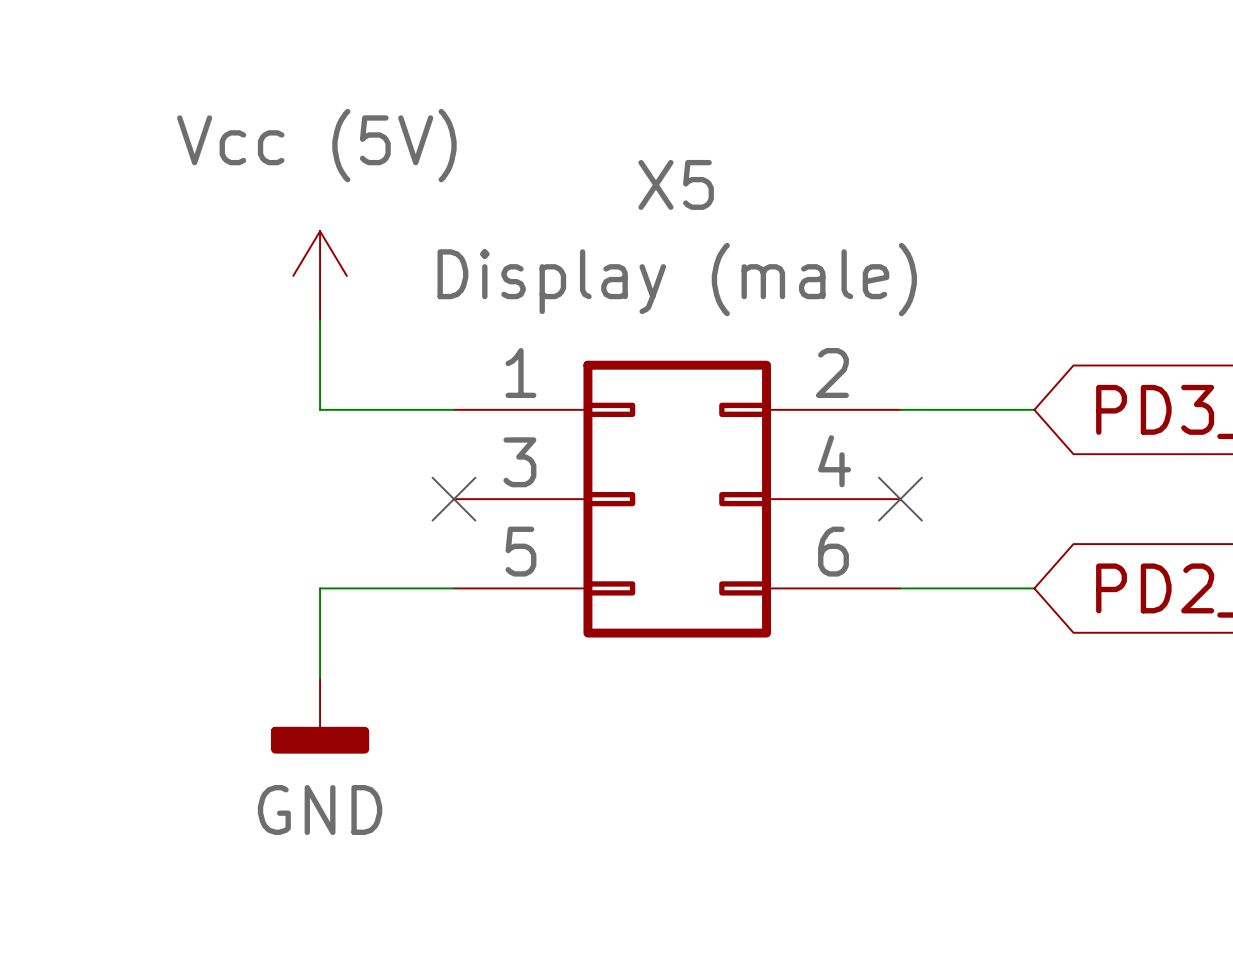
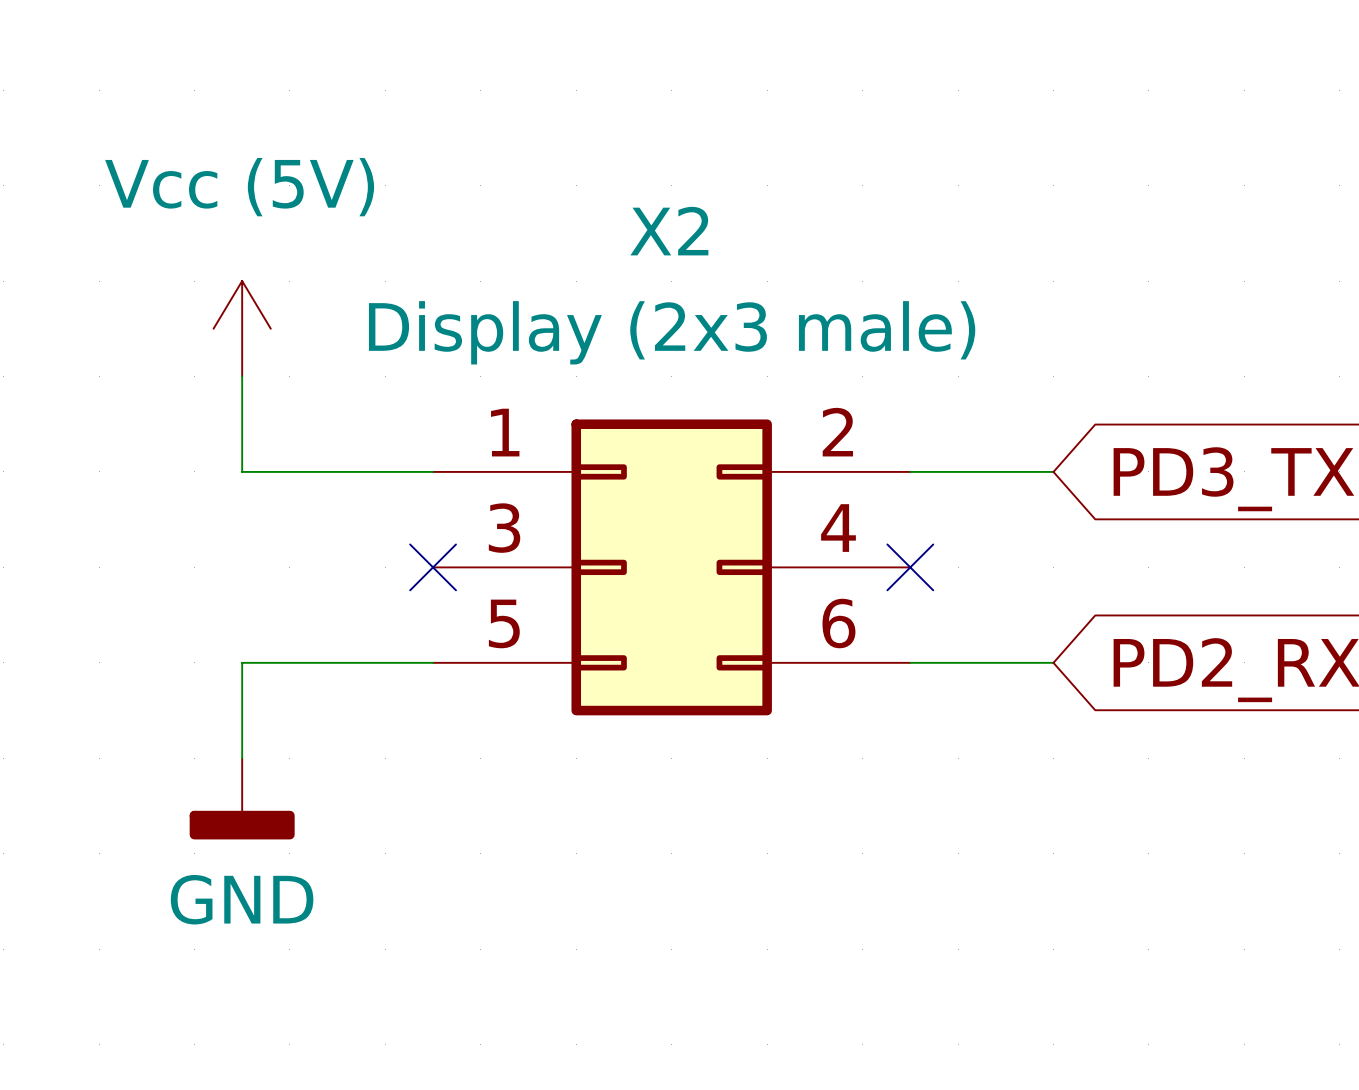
X5 name: X5 (676, 184) -> X2 (669, 231)
power symbol position: Vcc (5V) (320, 275) -> Vcc (5V) (242, 328)
X5 value: Display (male) (677, 279) -> Display (2x3 male) (672, 332)
wire: (320, 320) (320, 409) -> (242, 376) (242, 471) (289, 471)
wire: (320, 588) (320, 677) -> (289, 662) (242, 662) (242, 758)
power symbol position: GND (320, 715) -> GND (242, 798)

